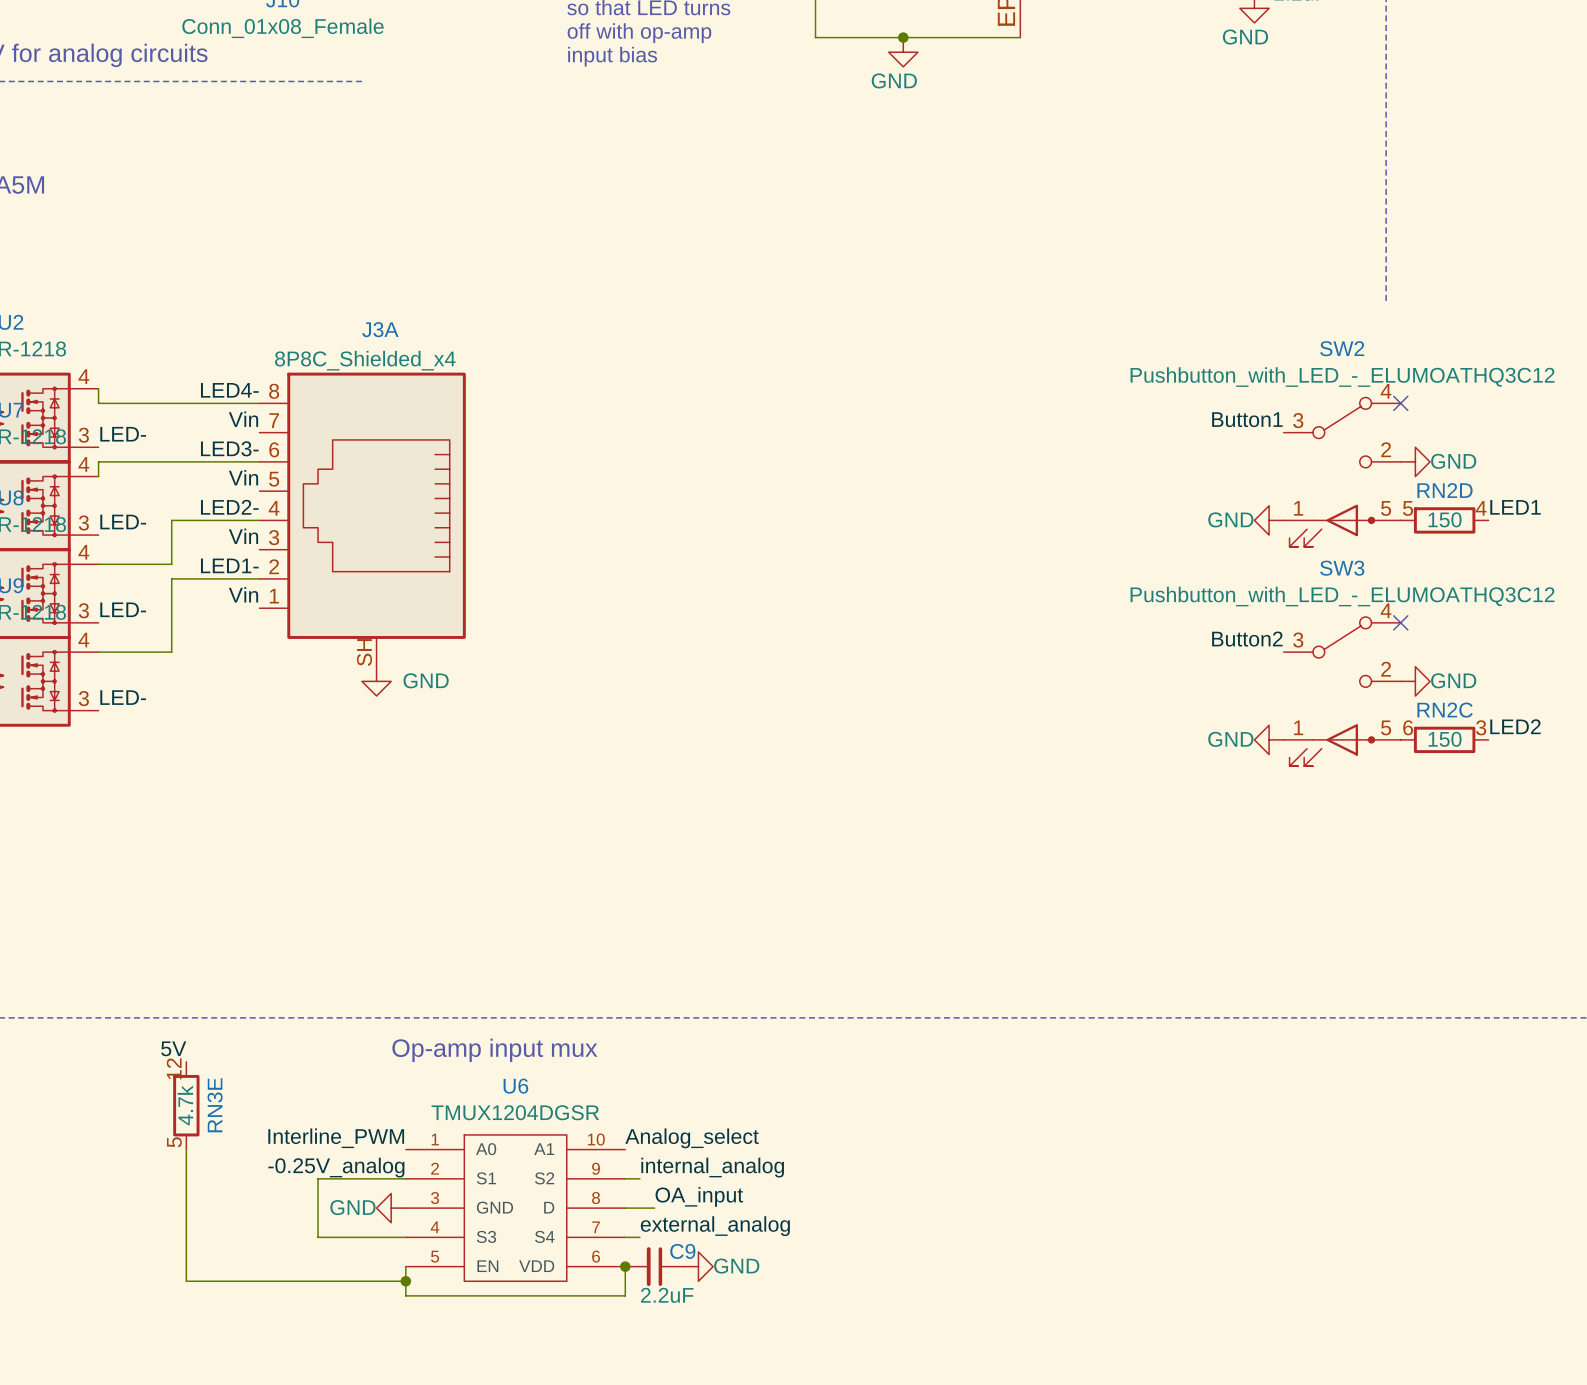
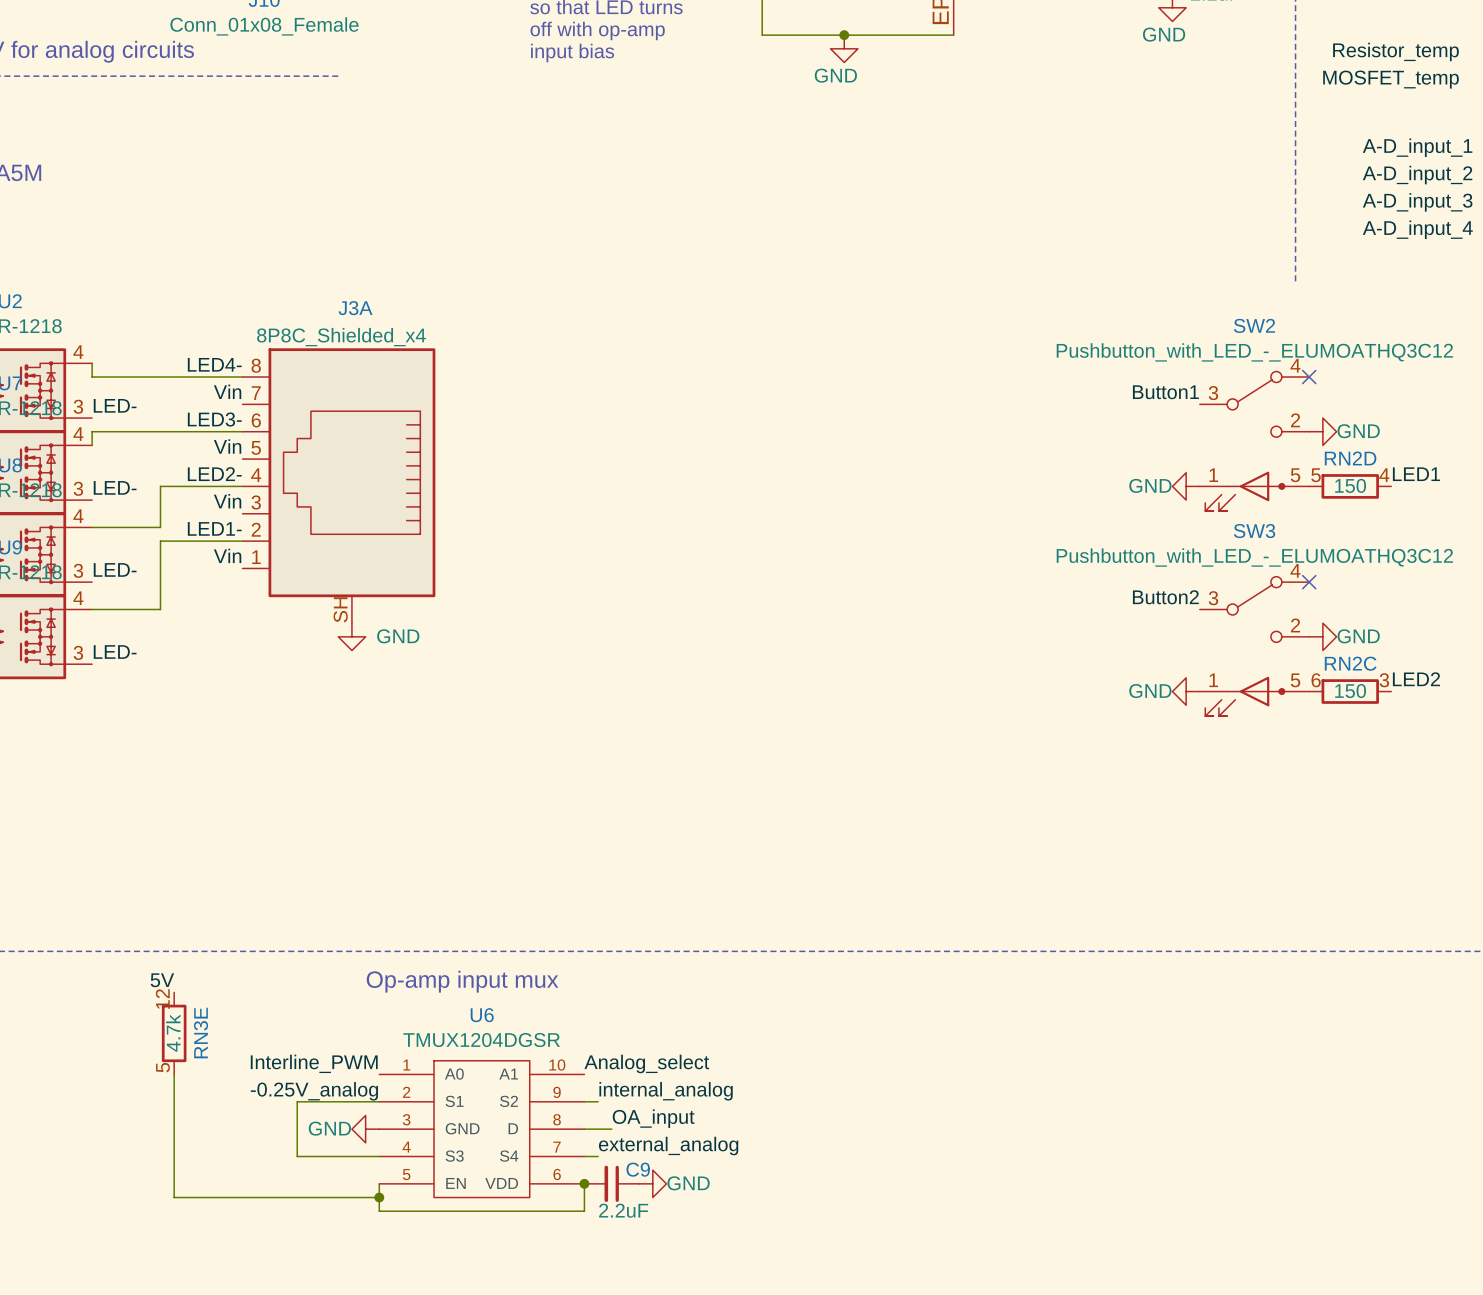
label: none -> Resistor_temp (1395, 51)
label: none -> MOSFET_temp (1391, 79)
label: none -> A-D_input_1 (1417, 147)
label: none -> A-D_input_2 (1417, 175)
label: none -> A-D_input_3 (1417, 202)
label: none -> A-D_input_4 (1417, 229)

